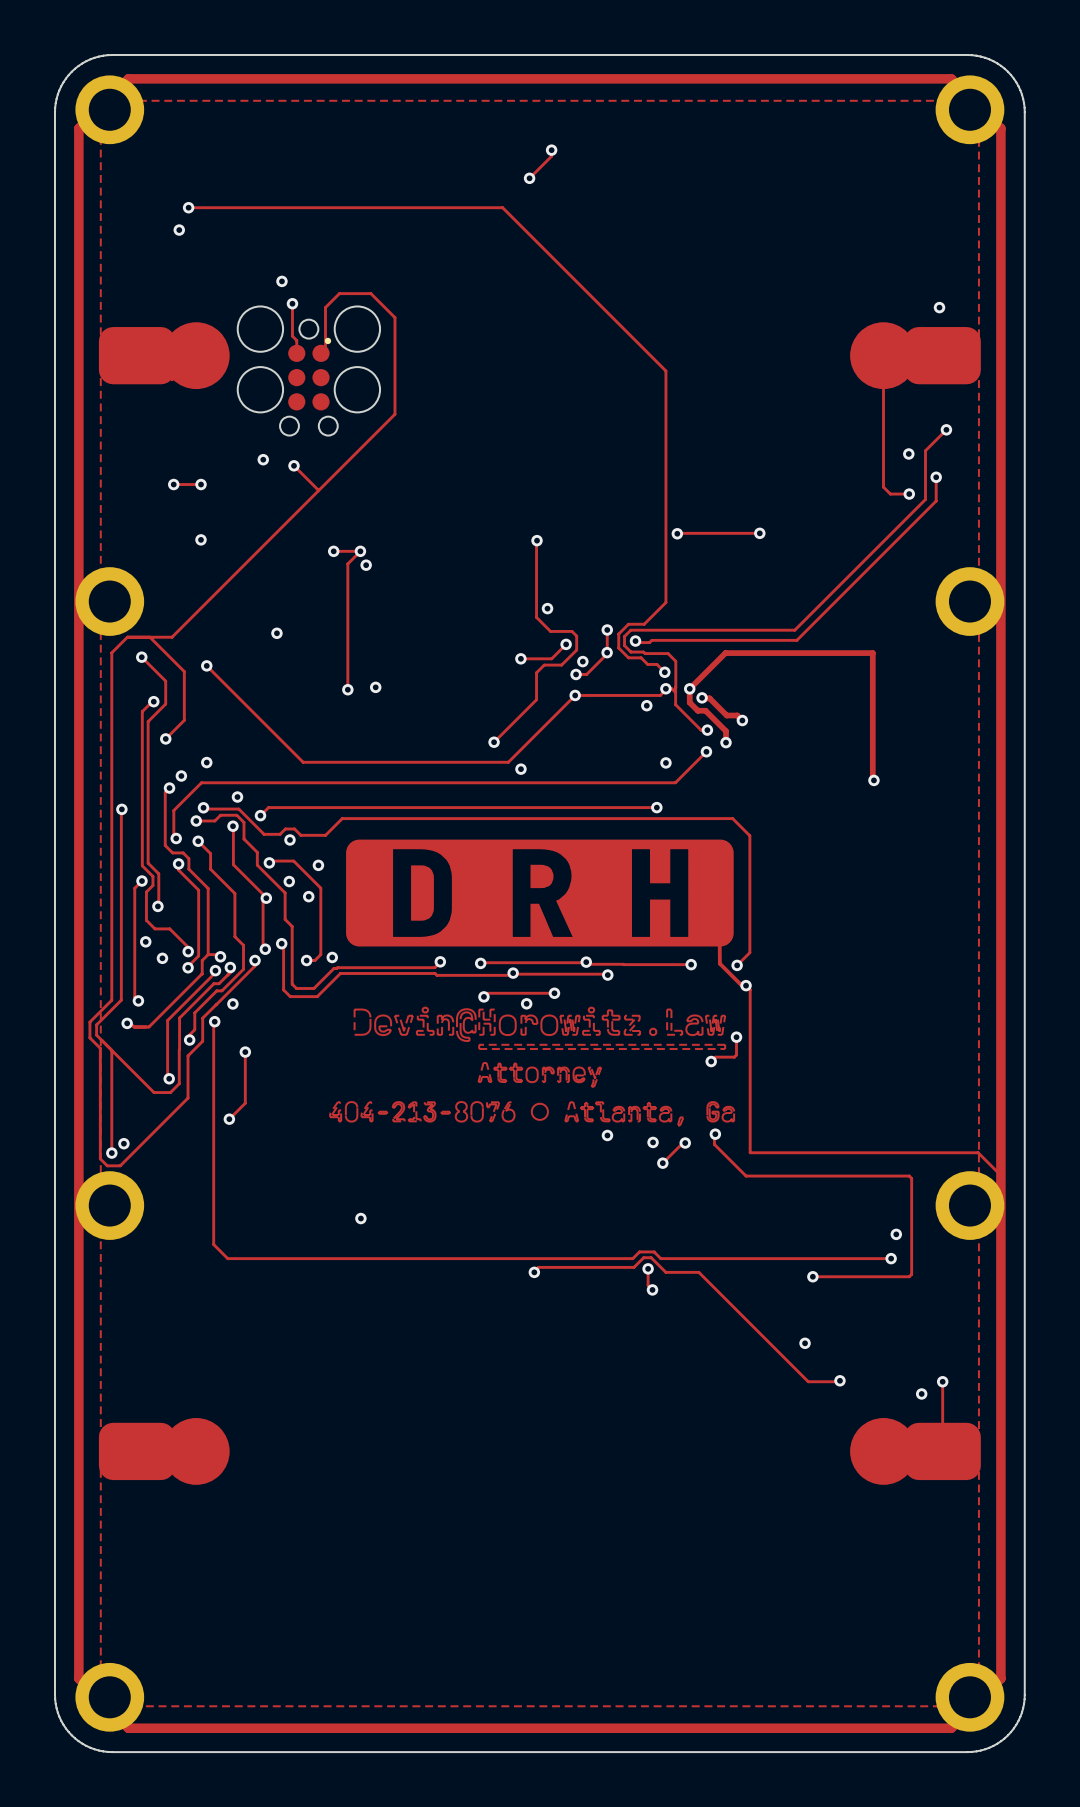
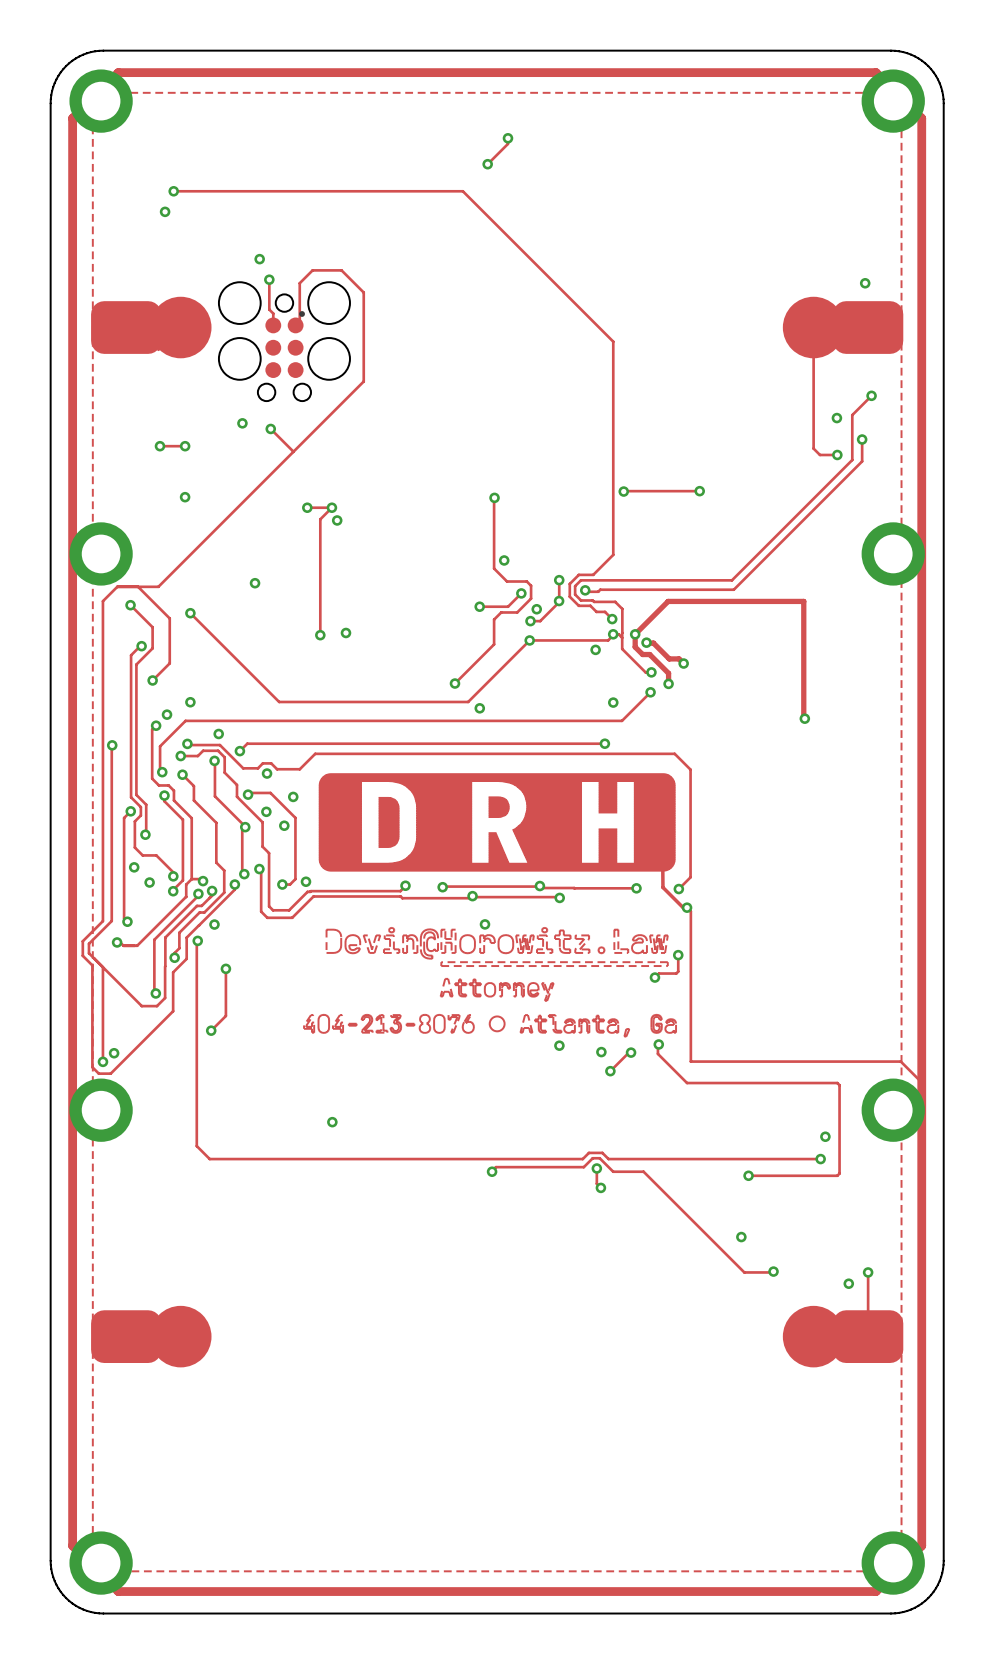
track: (554, 993) (487, 993) (483, 996) -> none
via: (554, 993) -> none
via: (483, 996) -> none

